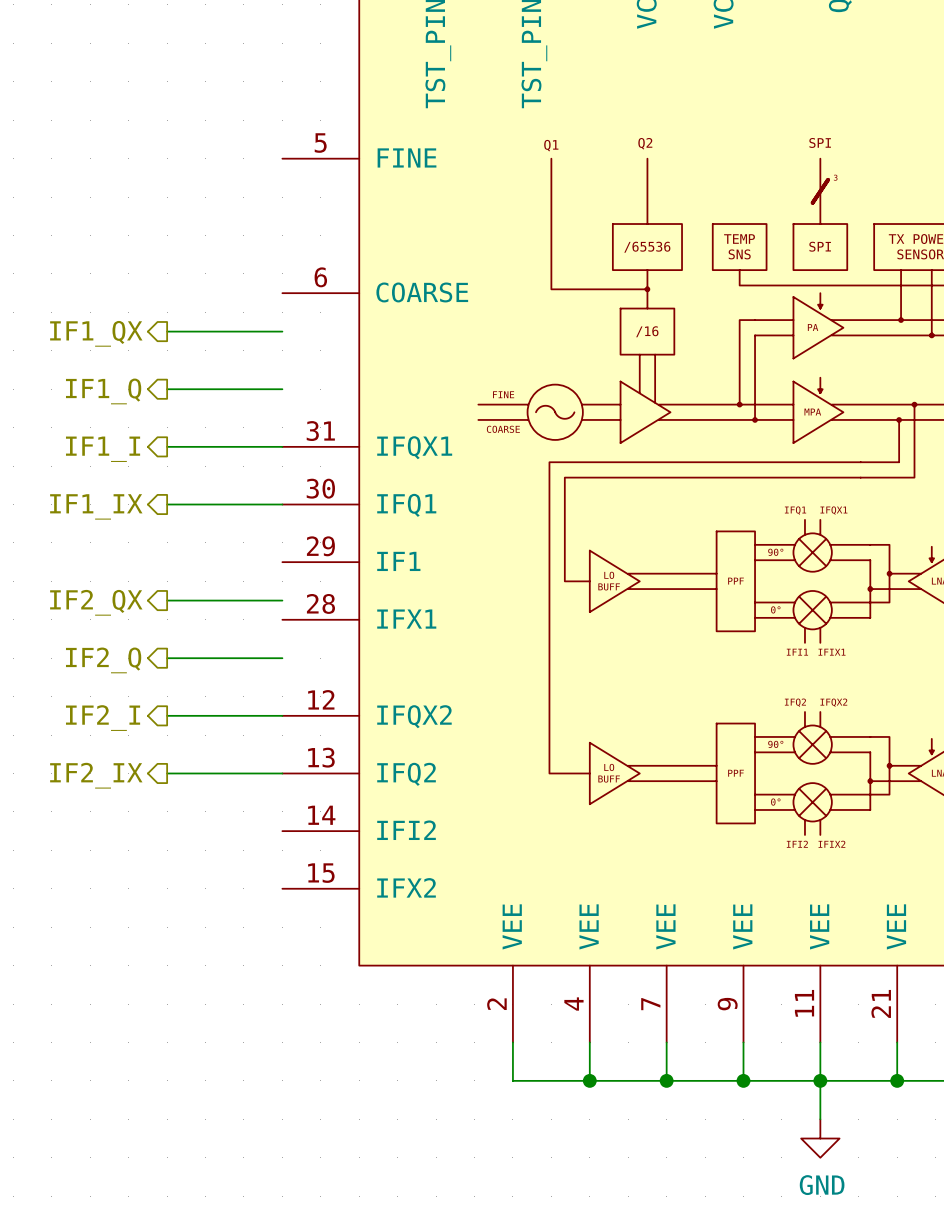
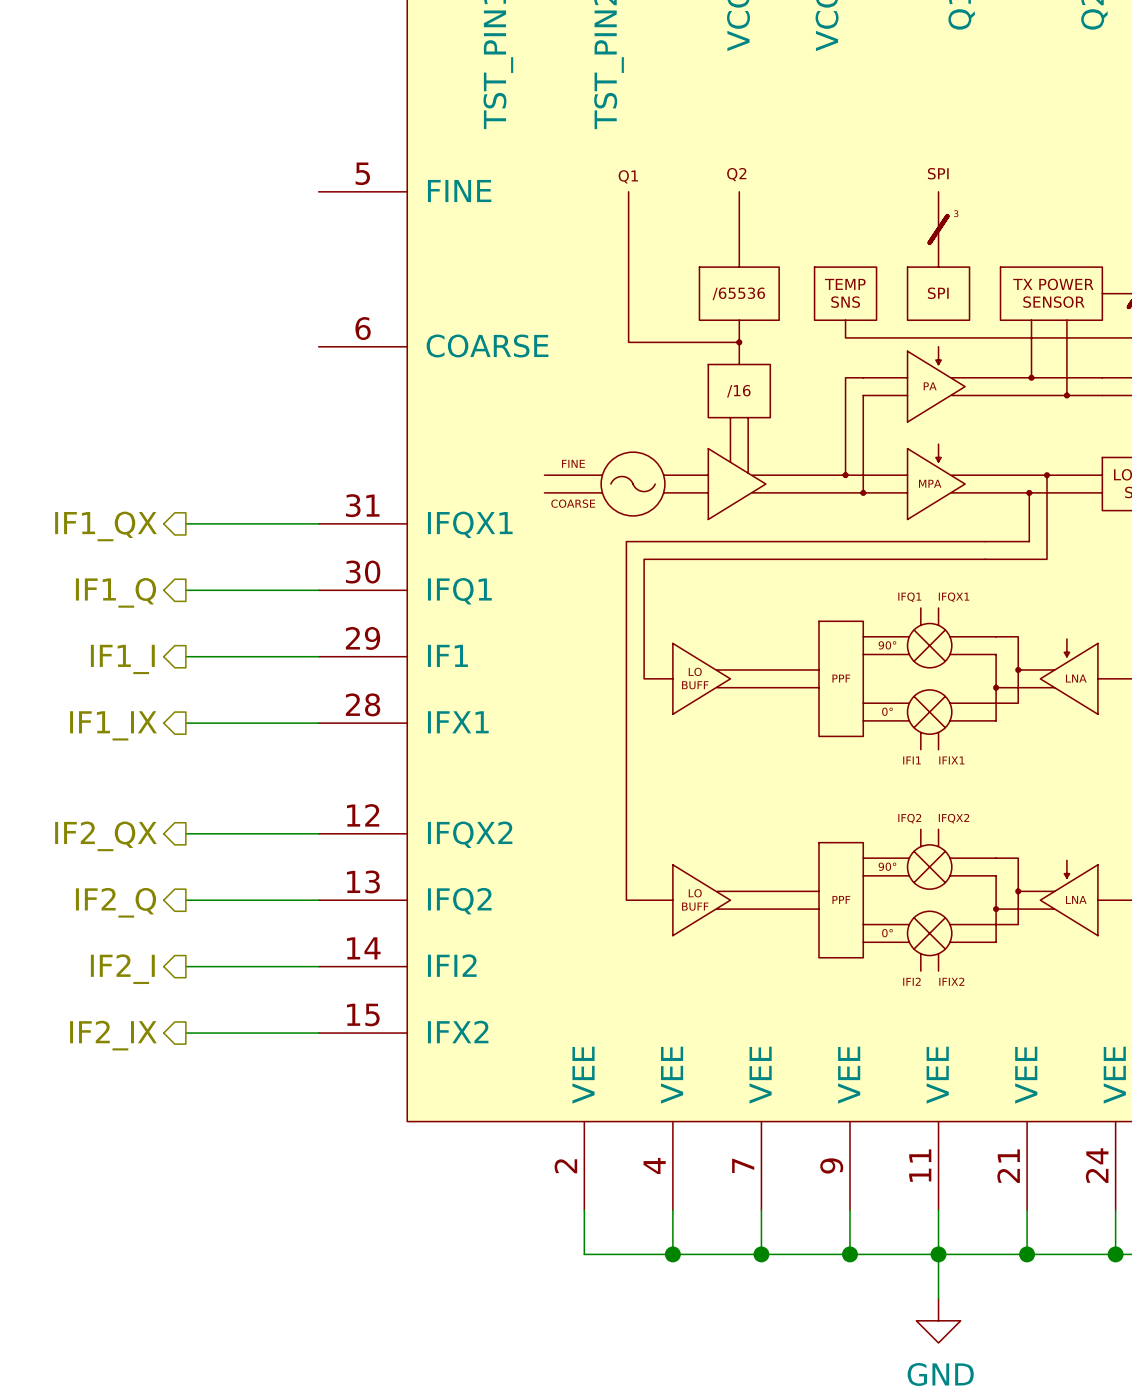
wire: (167, 331) (282, 331) -> (185, 656) (318, 656)
hierarchical label: IF1_QX (96, 333) -> none
wire: (167, 389) (282, 389) -> (185, 723) (318, 723)
hierarchical label: IF1_Q (103, 391) -> none
hierarchical label: IF1_I (103, 449) -> IF1_QX (105, 526)
hierarchical label: IF1_IX (96, 506) -> IF1_Q (115, 592)
hierarchical label: none -> IF1_I (122, 659)
wire: (167, 600) (282, 600) -> (185, 966) (318, 966)
hierarchical label: IF2_QX (96, 602) -> IF1_IX (113, 725)
wire: (167, 658) (282, 658) -> (185, 1033) (318, 1033)
hierarchical label: IF2_Q (103, 660) -> none
hierarchical label: IF2_I (103, 718) -> IF2_QX (105, 836)
hierarchical label: IF2_IX (96, 775) -> IF2_Q (115, 902)
hierarchical label: none -> IF2_I (122, 969)
hierarchical label: none -> IF2_IX (113, 1035)

